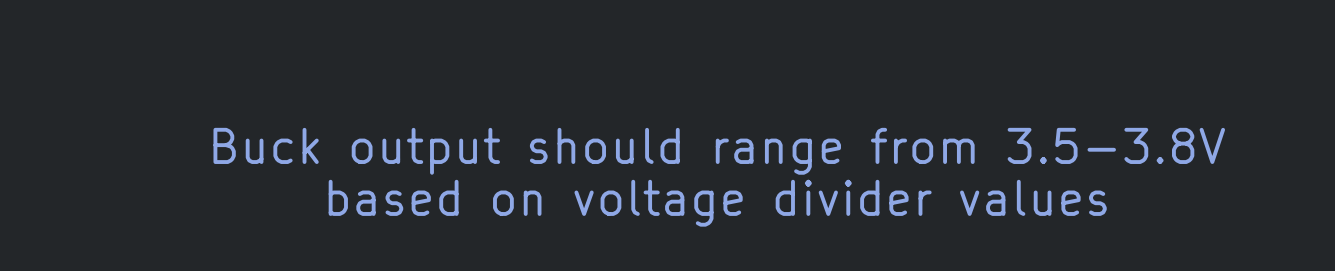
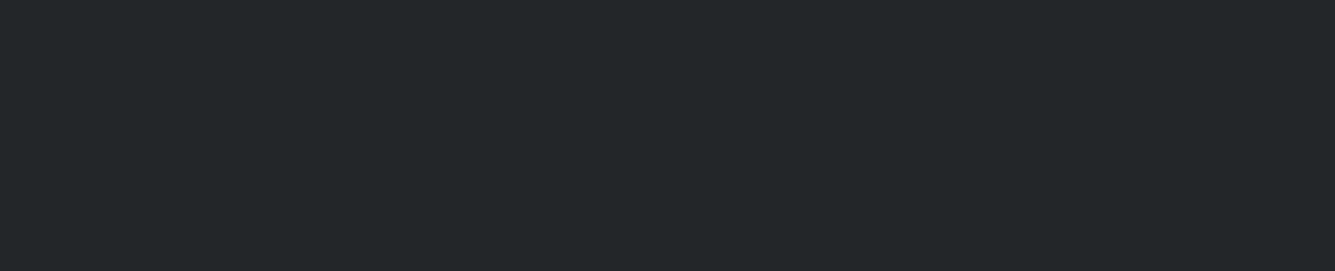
text: Buck output should range from 3.5-3.8V (719, 151) -> none
text: based on voltage divider values (717, 203) -> none

